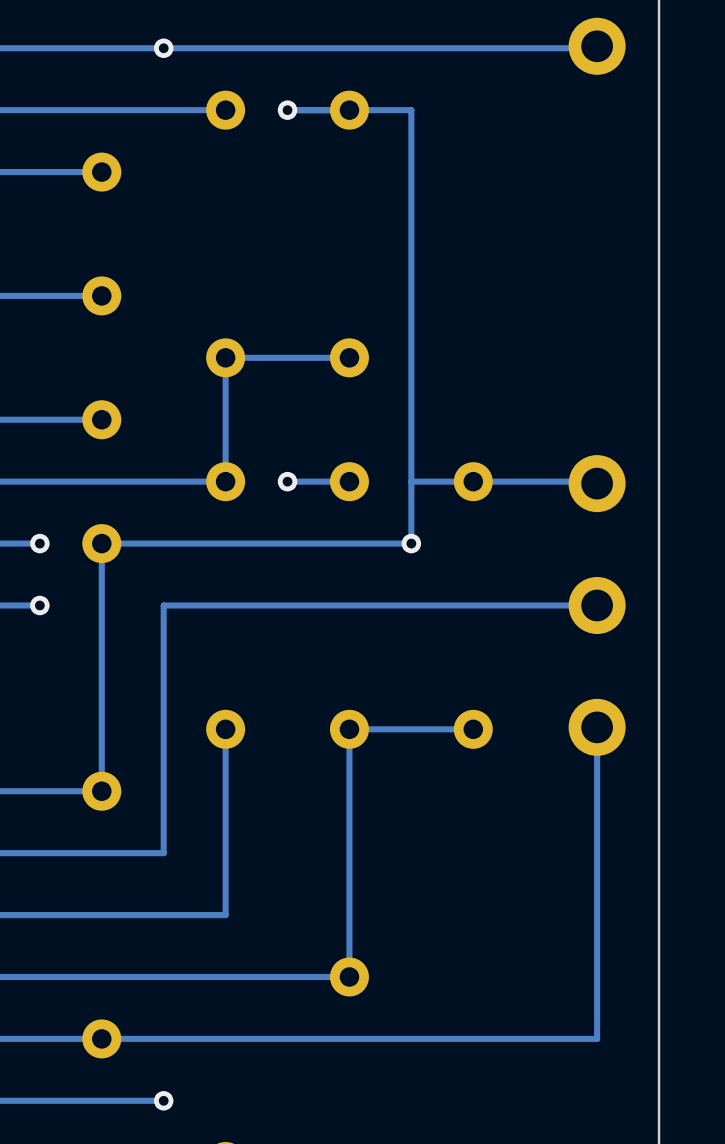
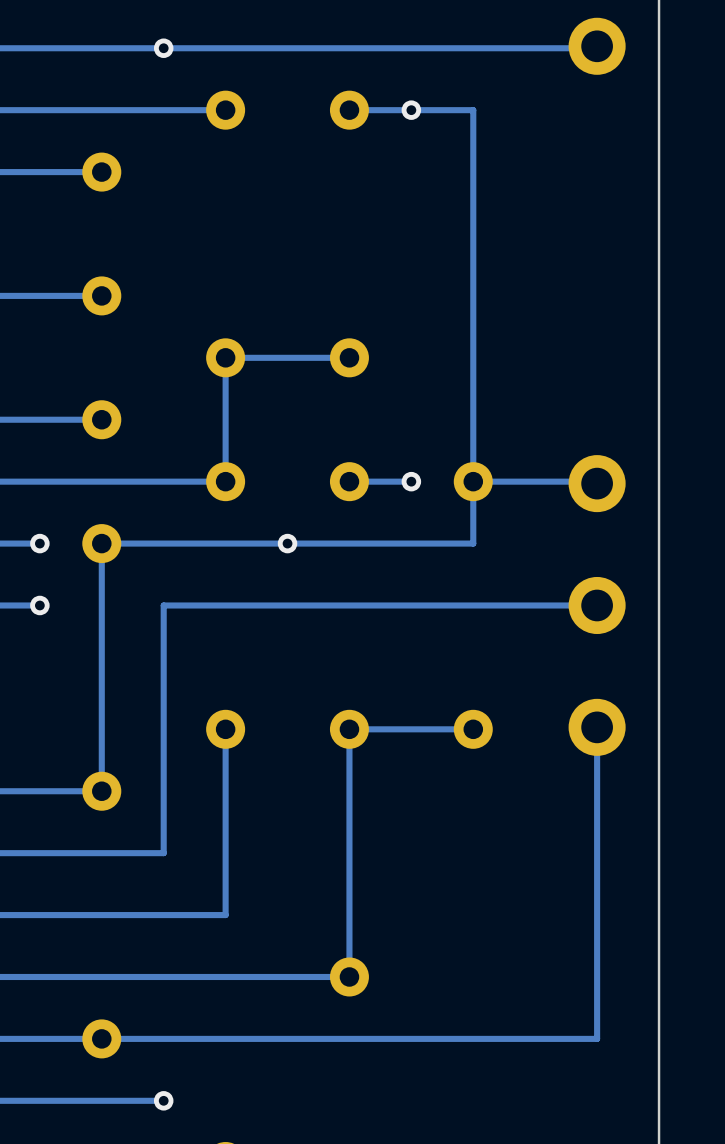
via position: (287, 110) -> (411, 110)
track: (411, 110) (411, 543) -> (411, 110) (473, 110) (473, 543) (411, 543)
via: (287, 481) -> none
track: (349, 481) (287, 481) -> none
via: none -> (411, 481)
track: (473, 481) (411, 481) -> (349, 481) (411, 481)
via: none -> (287, 543)
via: (411, 543) -> none

